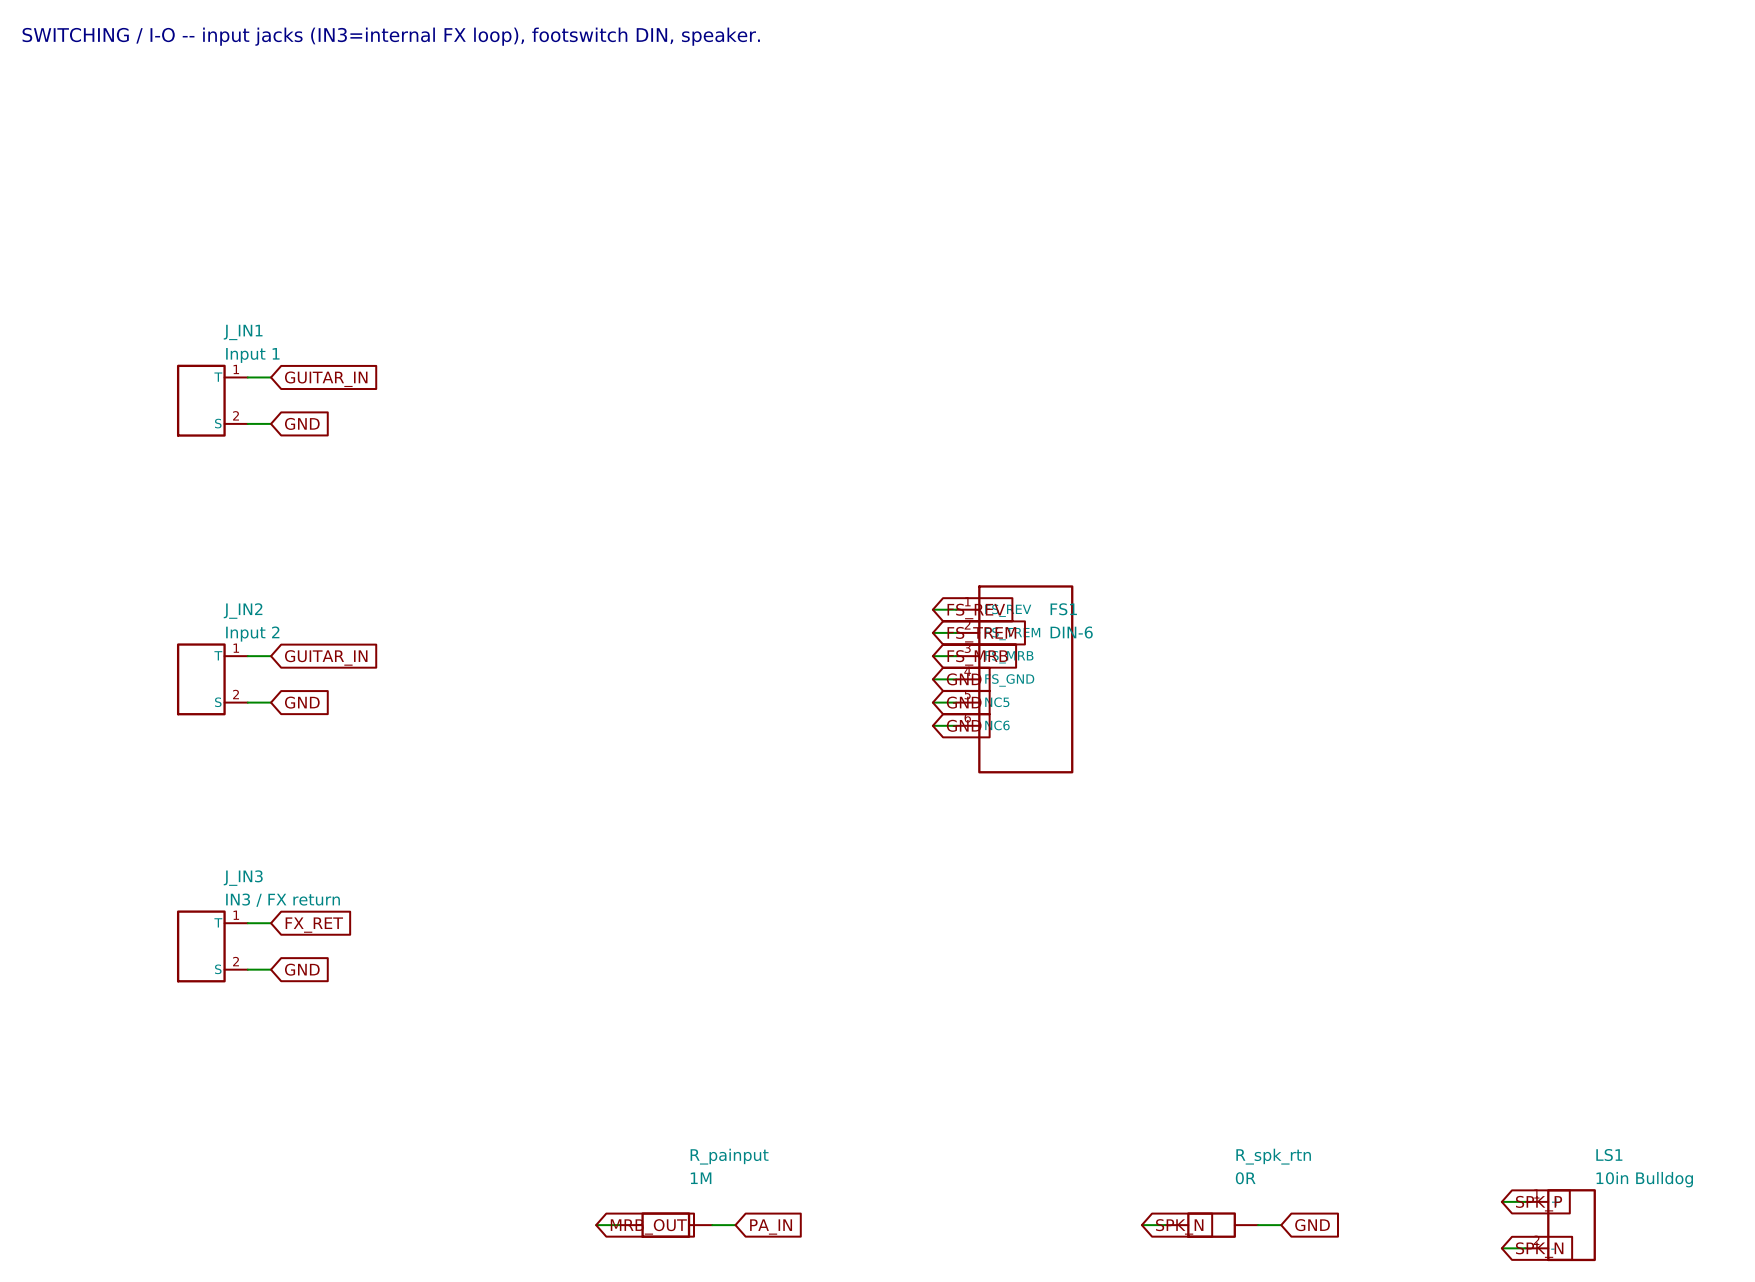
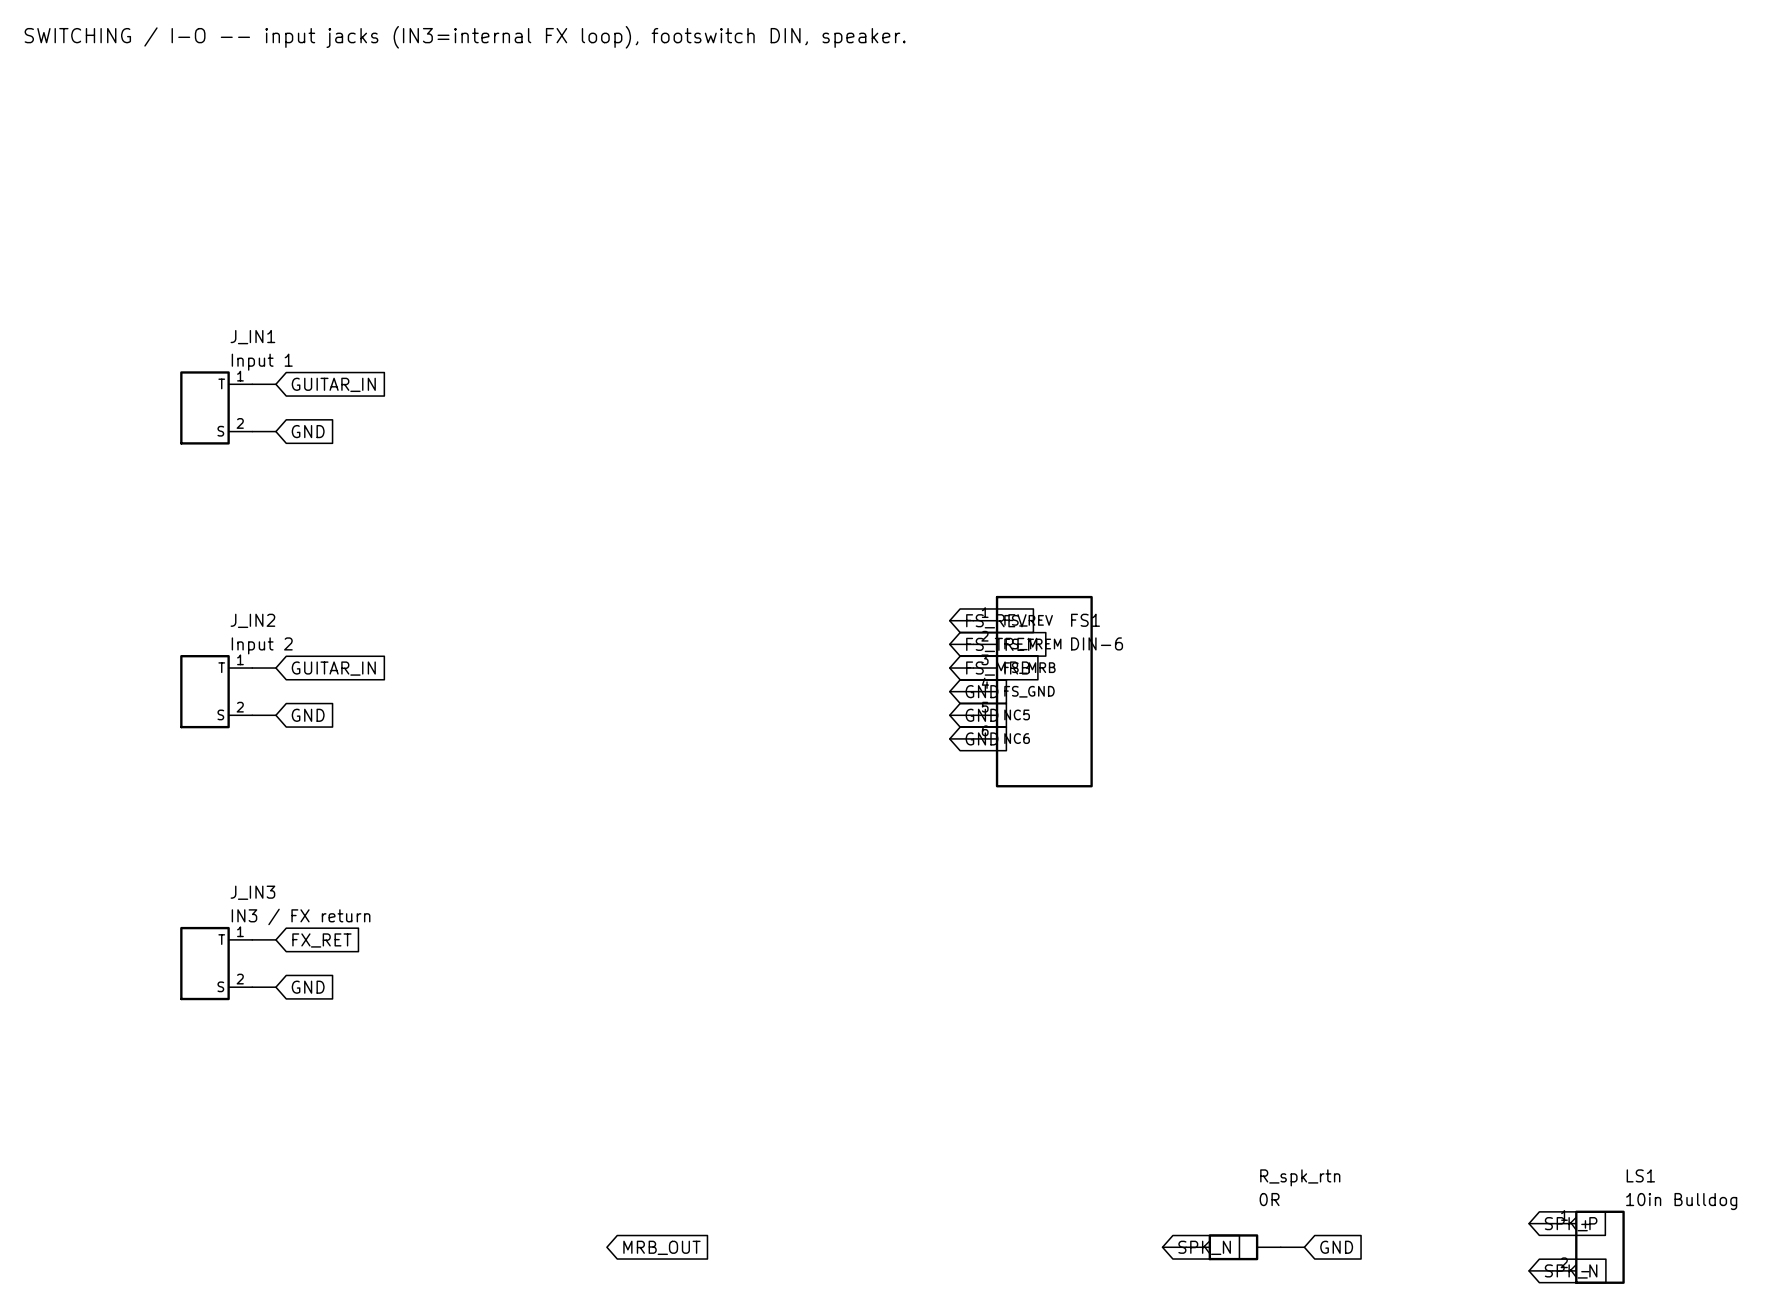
wire: (596, 1225) (619, 1225) -> none
R_painput: 1M (665, 1225) -> none
wire: (712, 1225) (735, 1225) -> none
global label: PA_IN (771, 1227) -> none

